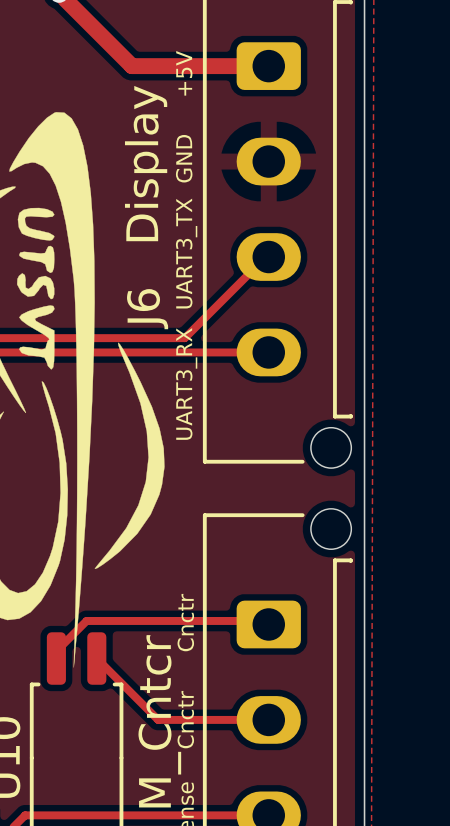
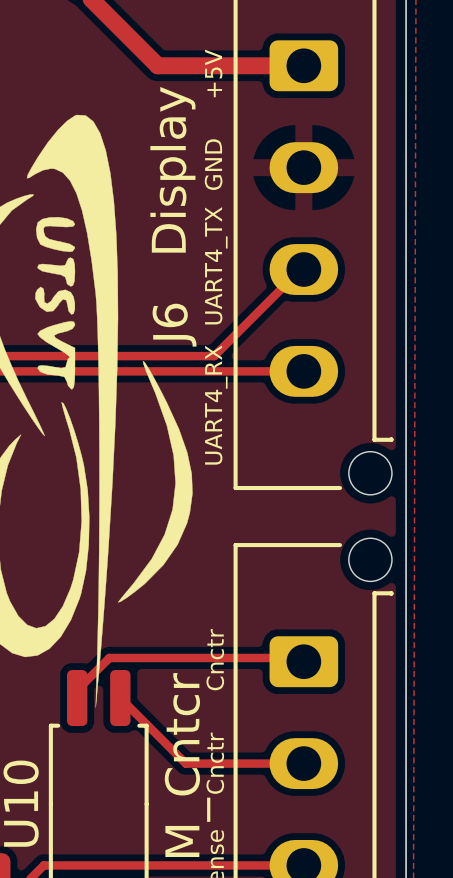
text: UART3_TX (186, 253) -> UART4_TX (216, 265)
text: UART3_RX (186, 383) -> UART4_RX (216, 405)

